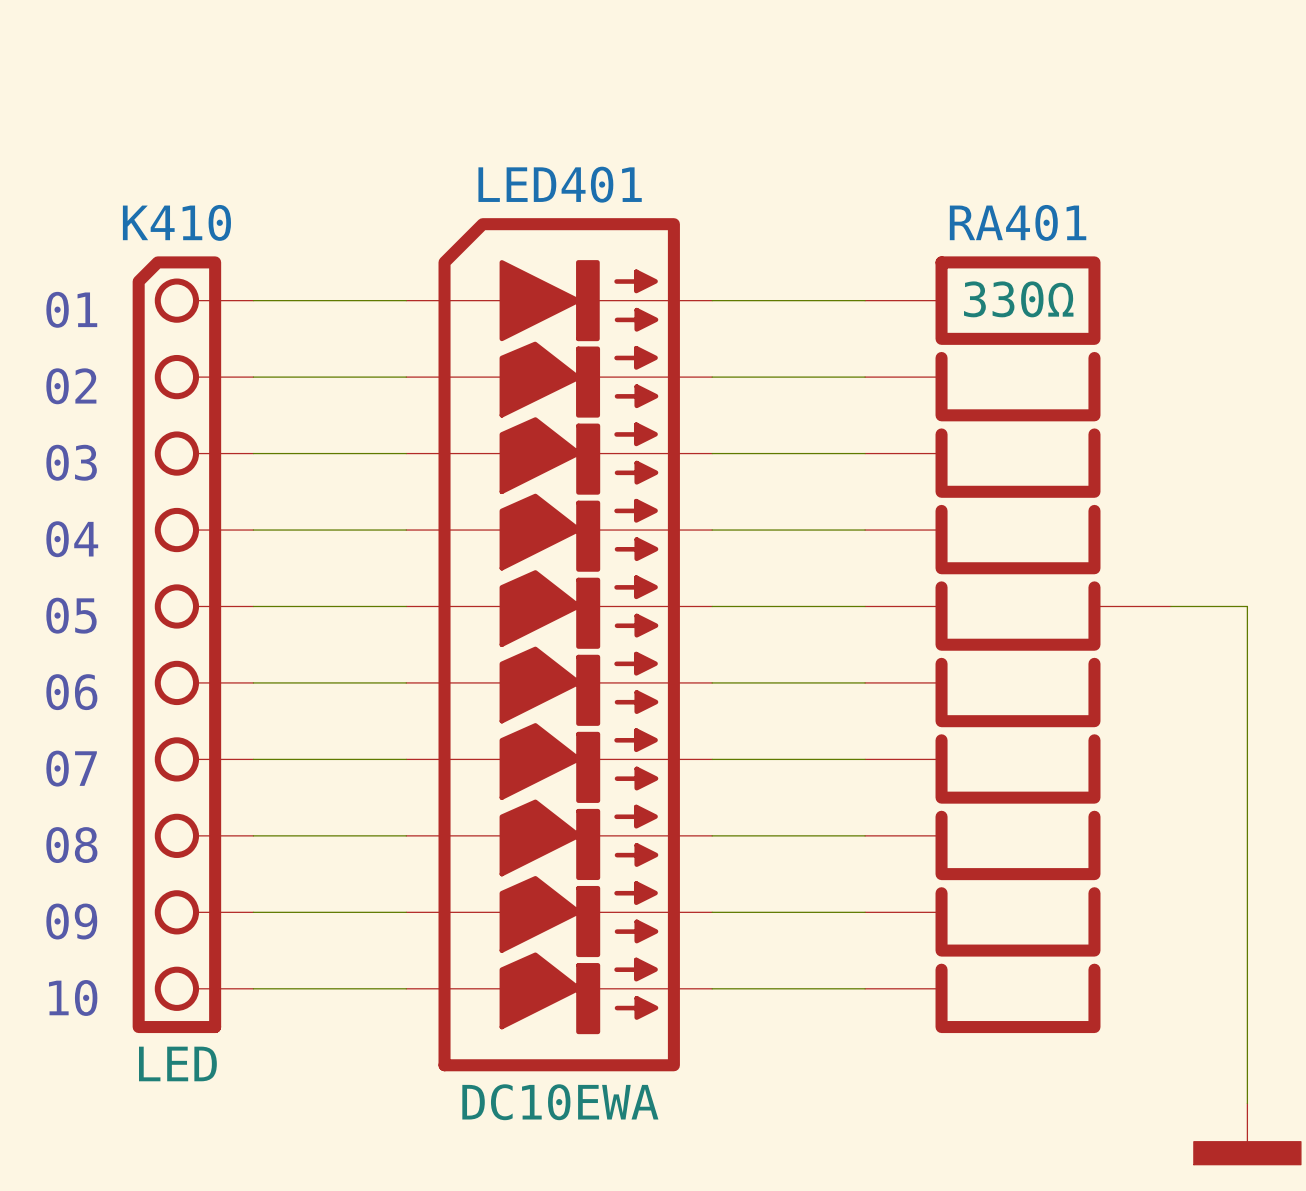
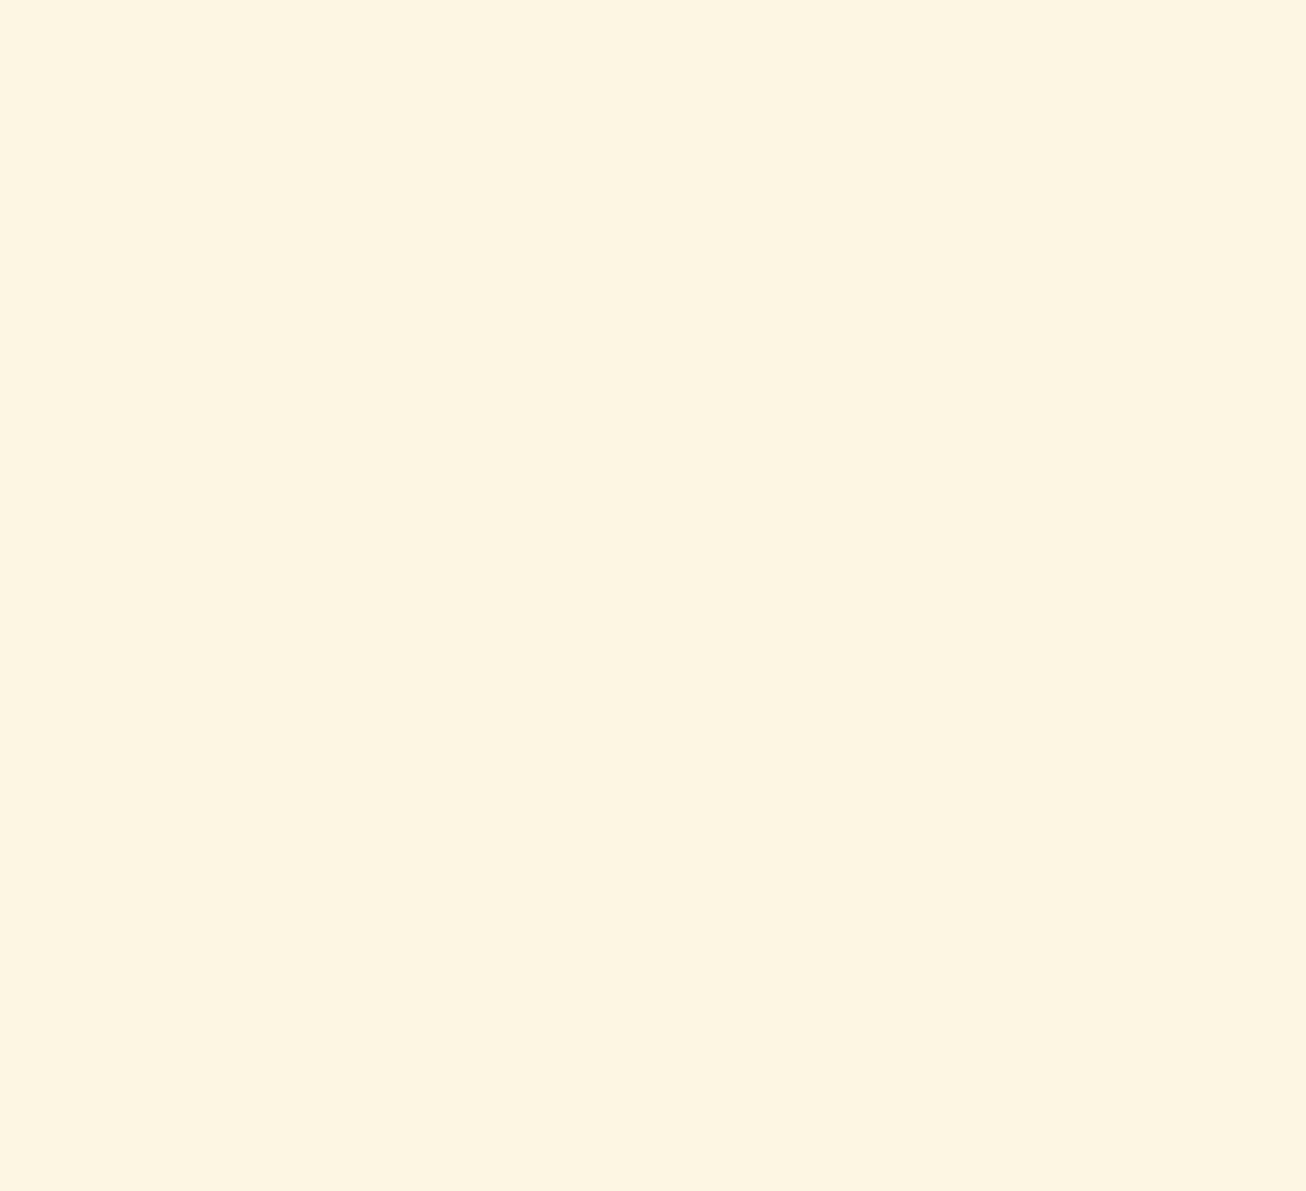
wire: (253, 300) (406, 300) -> none
wire: (712, 300) (865, 300) -> none
text: 01 (71, 309) -> none
wire: (253, 377) (406, 377) -> none
wire: (712, 377) (865, 377) -> none
text: 02 (71, 386) -> none
wire: (253, 453) (406, 453) -> none
wire: (712, 453) (865, 453) -> none
text: 03 (71, 462) -> none
wire: (253, 530) (406, 530) -> none
wire: (712, 530) (865, 530) -> none
text: 04 (72, 539) -> none
wire: (253, 606) (406, 606) -> none
wire: (712, 606) (865, 606) -> none
wire: (1170, 606) (1247, 606) (1247, 1103) -> none
text: 05 (71, 615) -> none
K410: LED (193, 644) -> none
LED401: (559, 644) -> none
RA401: (1018, 644) -> none
wire: (253, 682) (406, 682) -> none
wire: (712, 682) (865, 682) -> none
text: 06 (71, 692) -> none
wire: (253, 759) (406, 759) -> none
wire: (712, 759) (865, 759) -> none
text: 07 (71, 768) -> none
wire: (253, 835) (406, 835) -> none
wire: (712, 835) (865, 835) -> none
text: 08 (71, 845) -> none
wire: (253, 912) (406, 912) -> none
wire: (712, 912) (865, 912) -> none
text: 09 (71, 921) -> none
wire: (253, 988) (406, 988) -> none
wire: (712, 988) (865, 988) -> none
text: 10 (73, 997) -> none
power symbol: (1247, 1134) -> none

